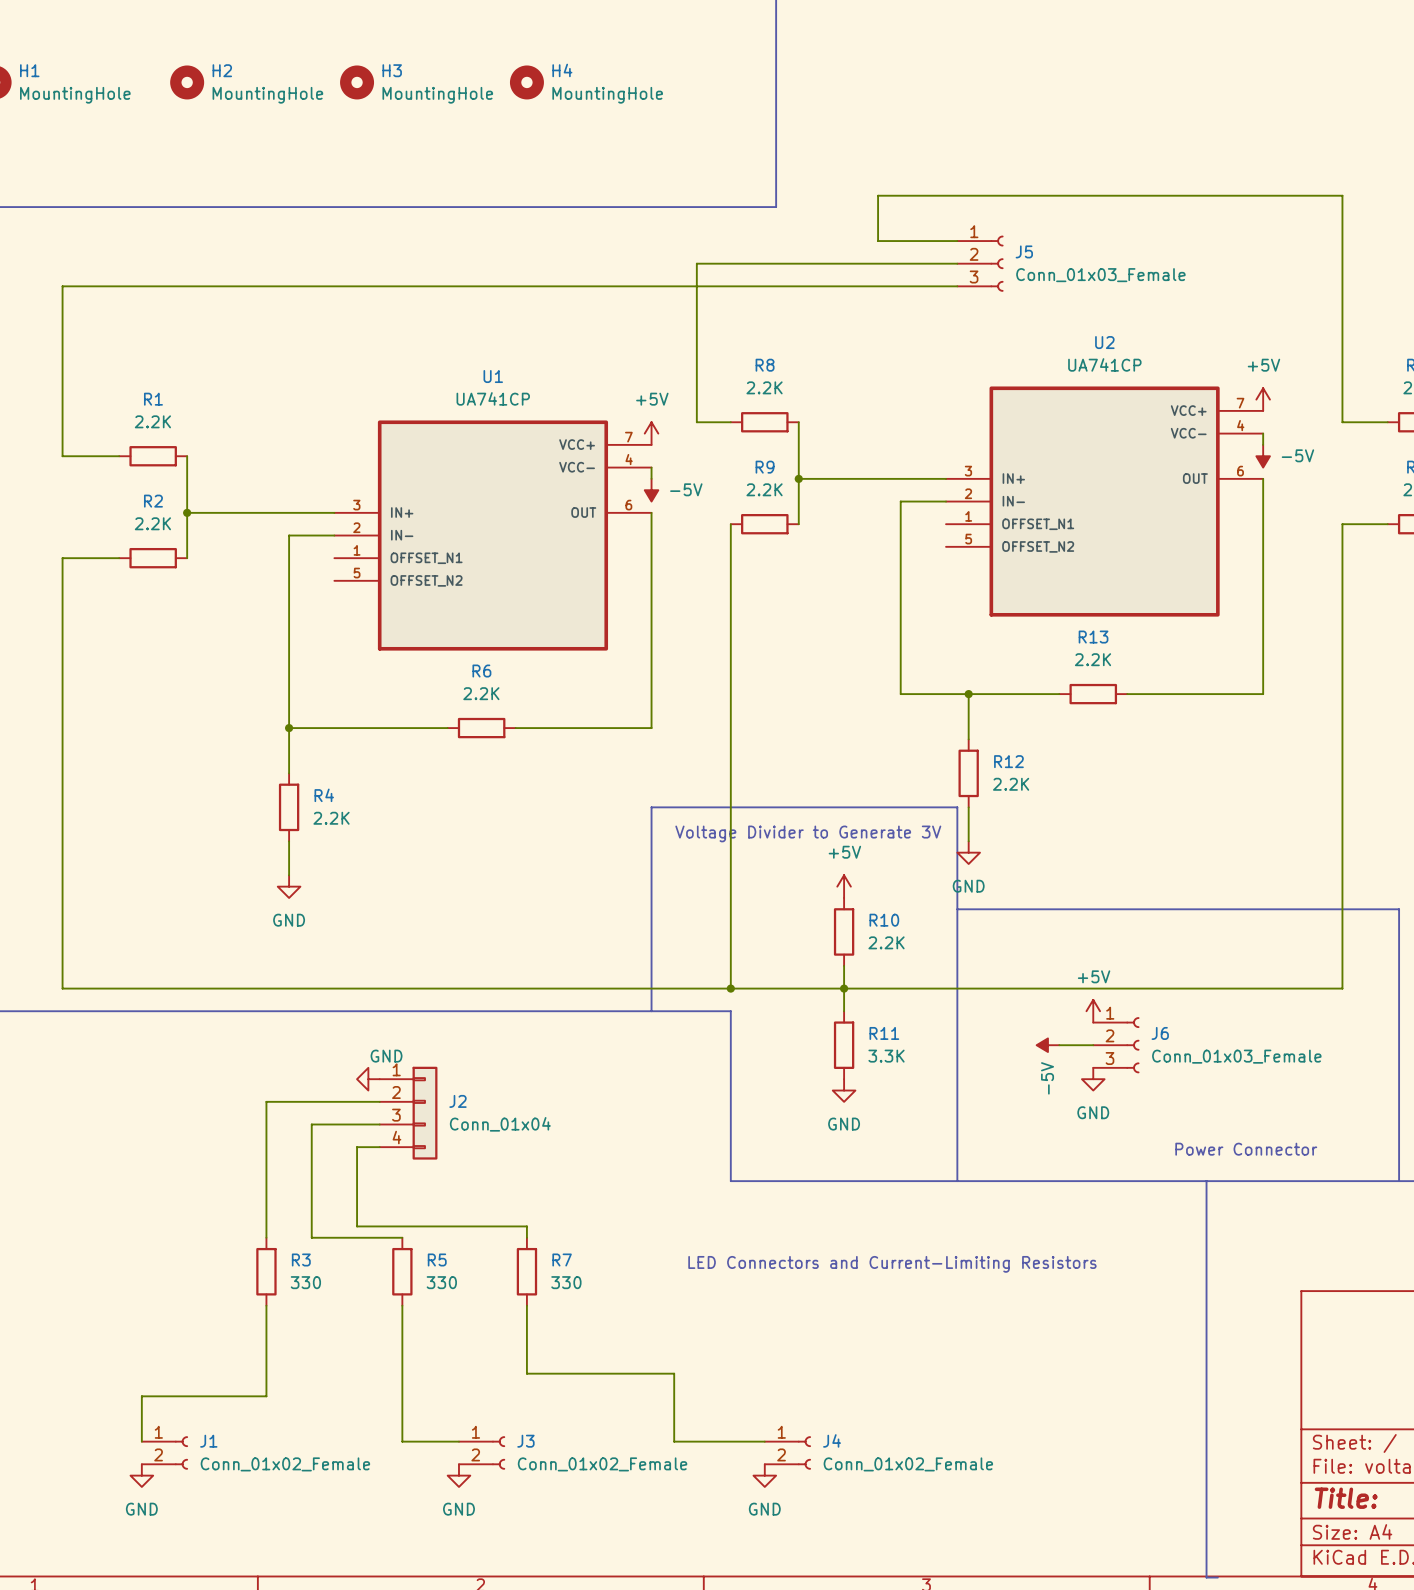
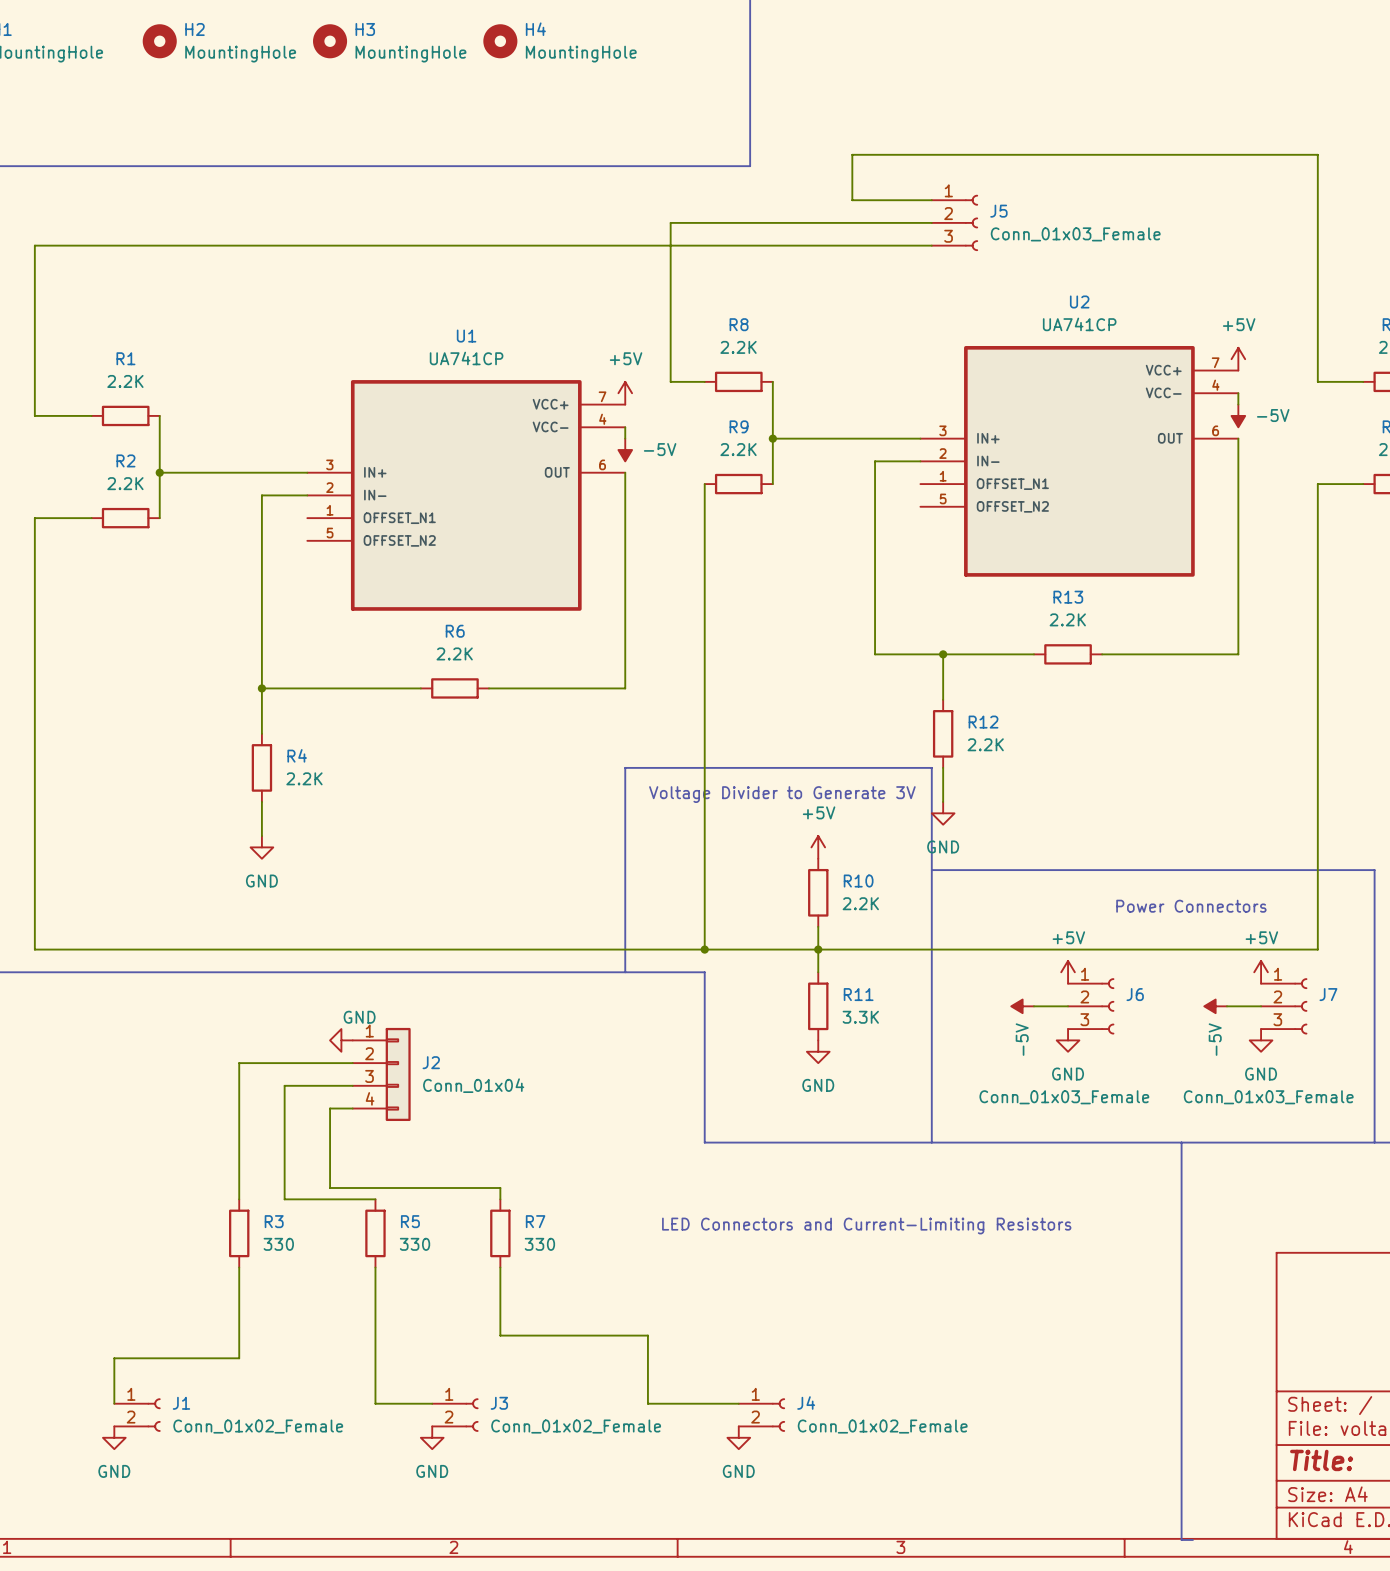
text: none -> Power Connectors (1191, 906)
power symbol: none -> +5V (1261, 972)
power symbol: none -> -5V (1215, 1006)
wire: none -> (1227, 1006) (1261, 1006)
J7: none -> Conn_01x03_Female (1284, 1006)
J6 value position: Conn_01x03_Female (1236, 1056) -> Conn_01x03_Female (1064, 1097)
power symbol: none -> GND (1261, 1040)
text: Power Connector (1246, 1149) -> none

